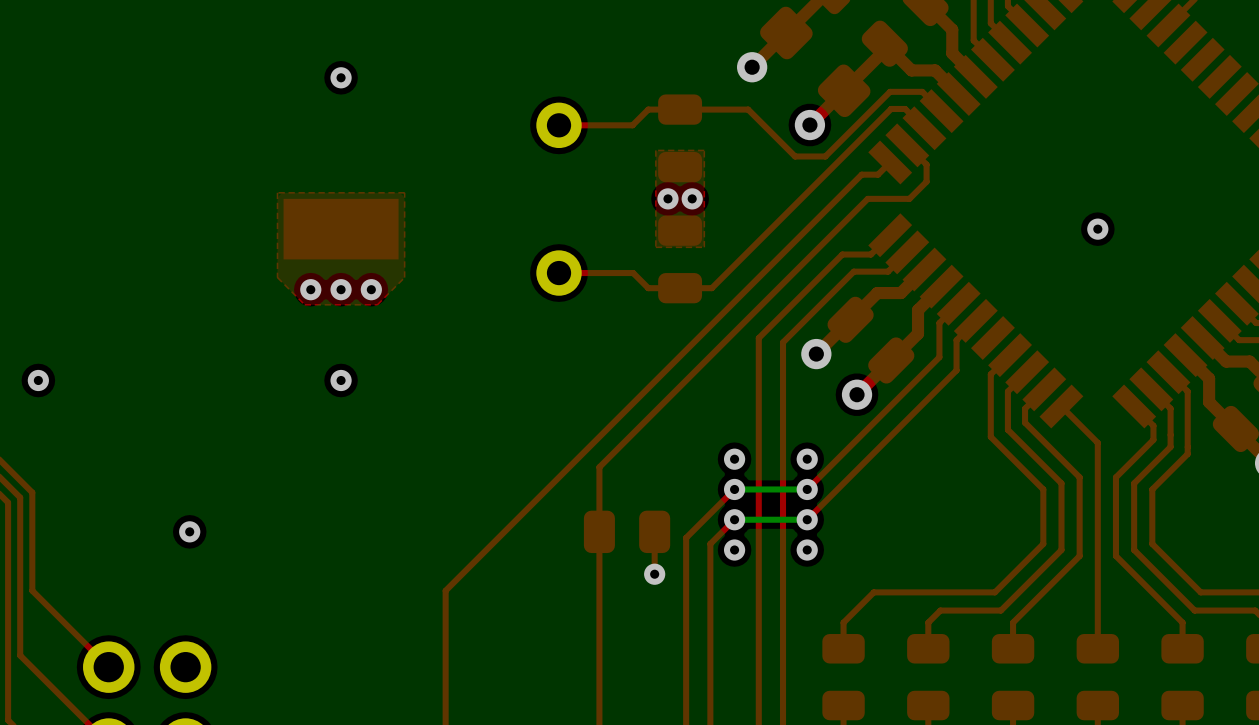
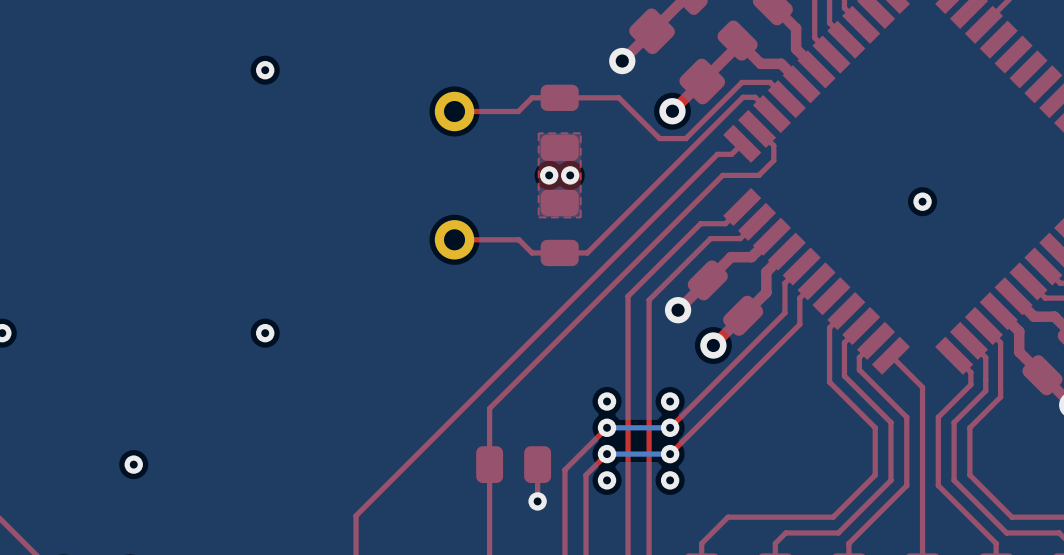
top zone outline: (404, 192) (277, 192) (277, 277) (304, 304) (377, 304) (404, 277) (404, 192) -> none
part: (341, 229) -> none
via: (310, 289) -> none
via: (341, 289) -> none
via: (371, 289) -> none

